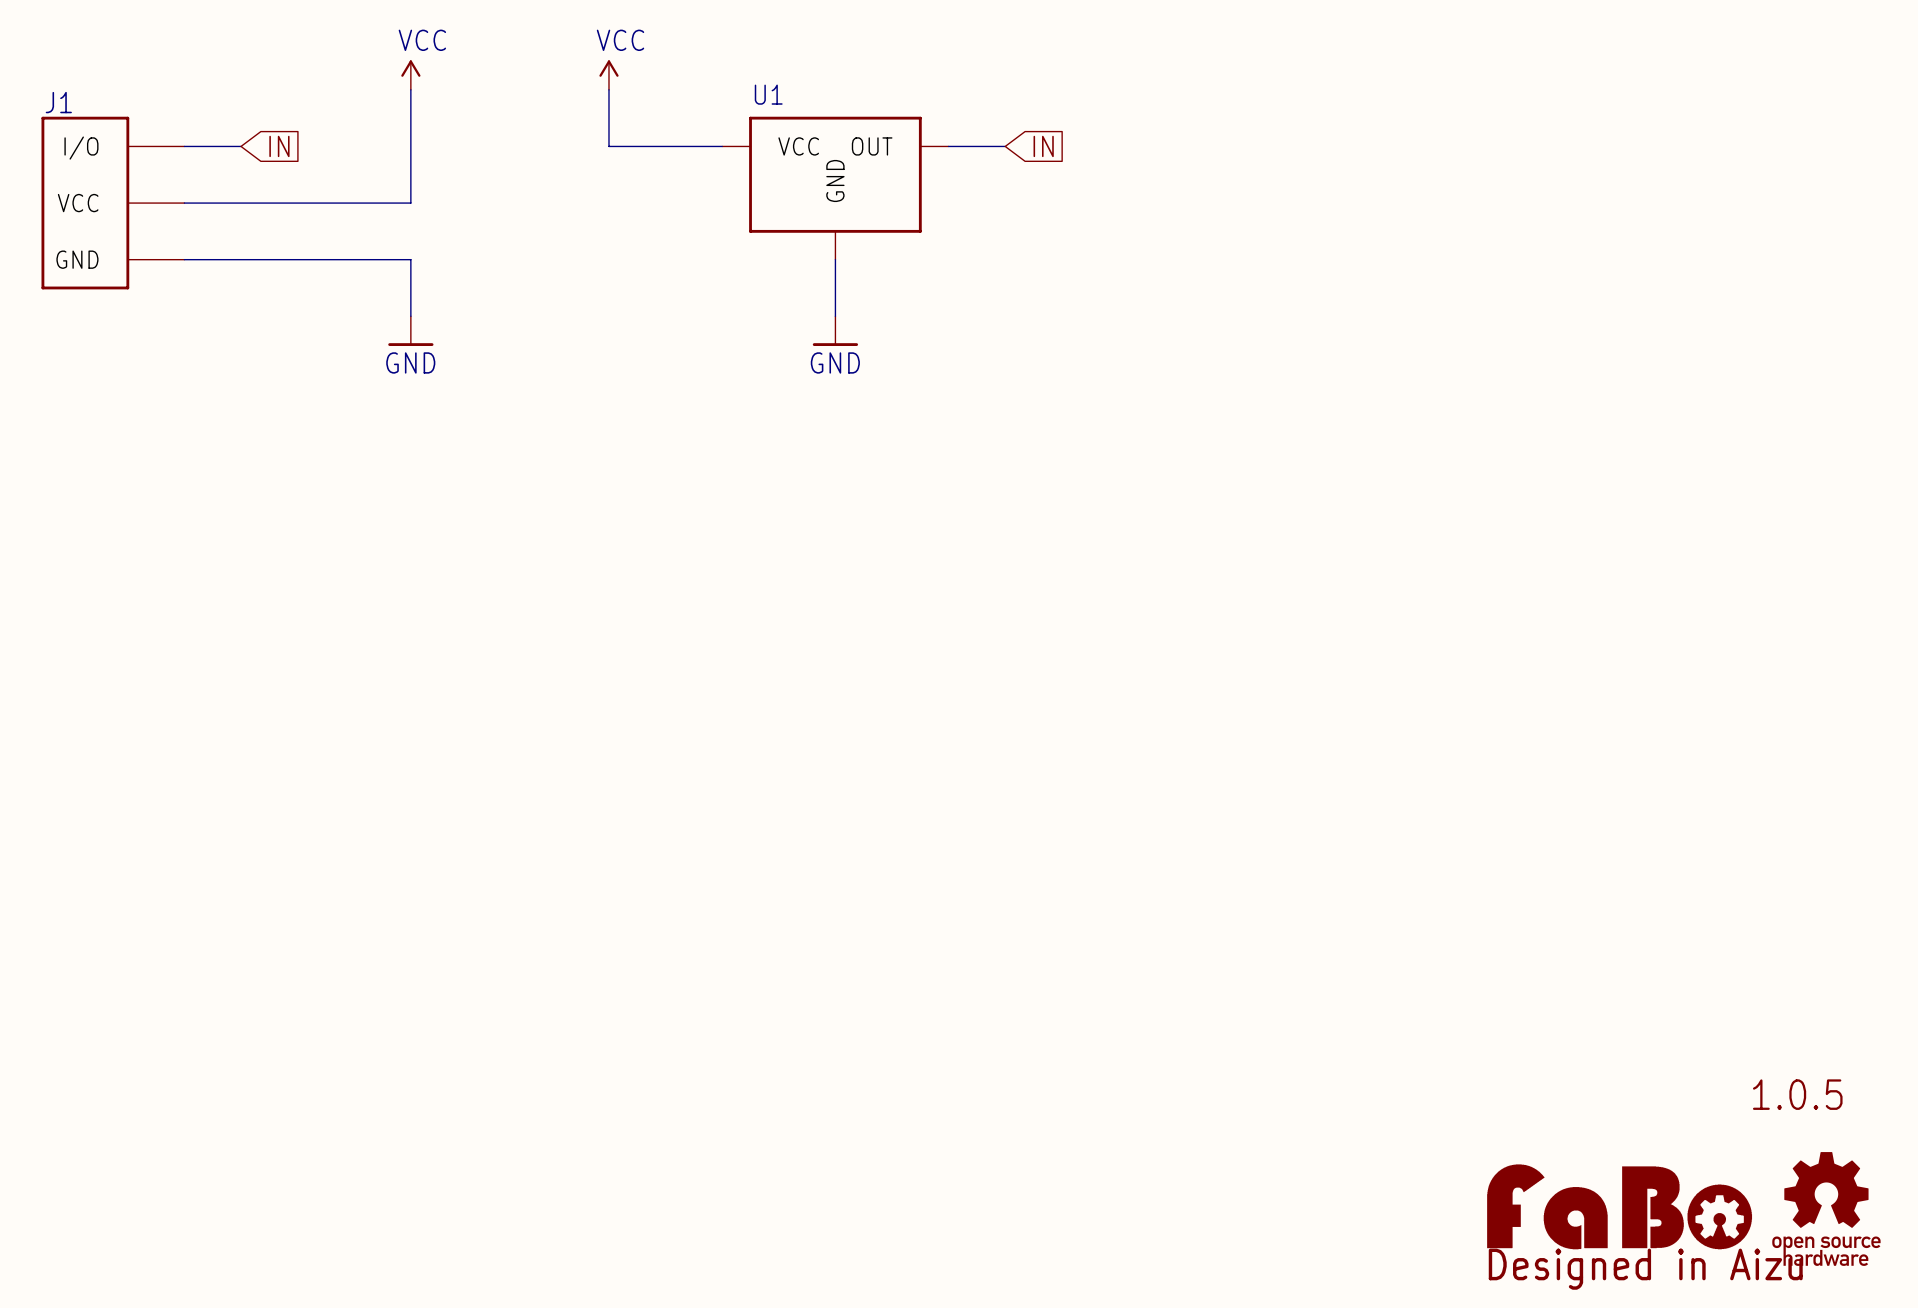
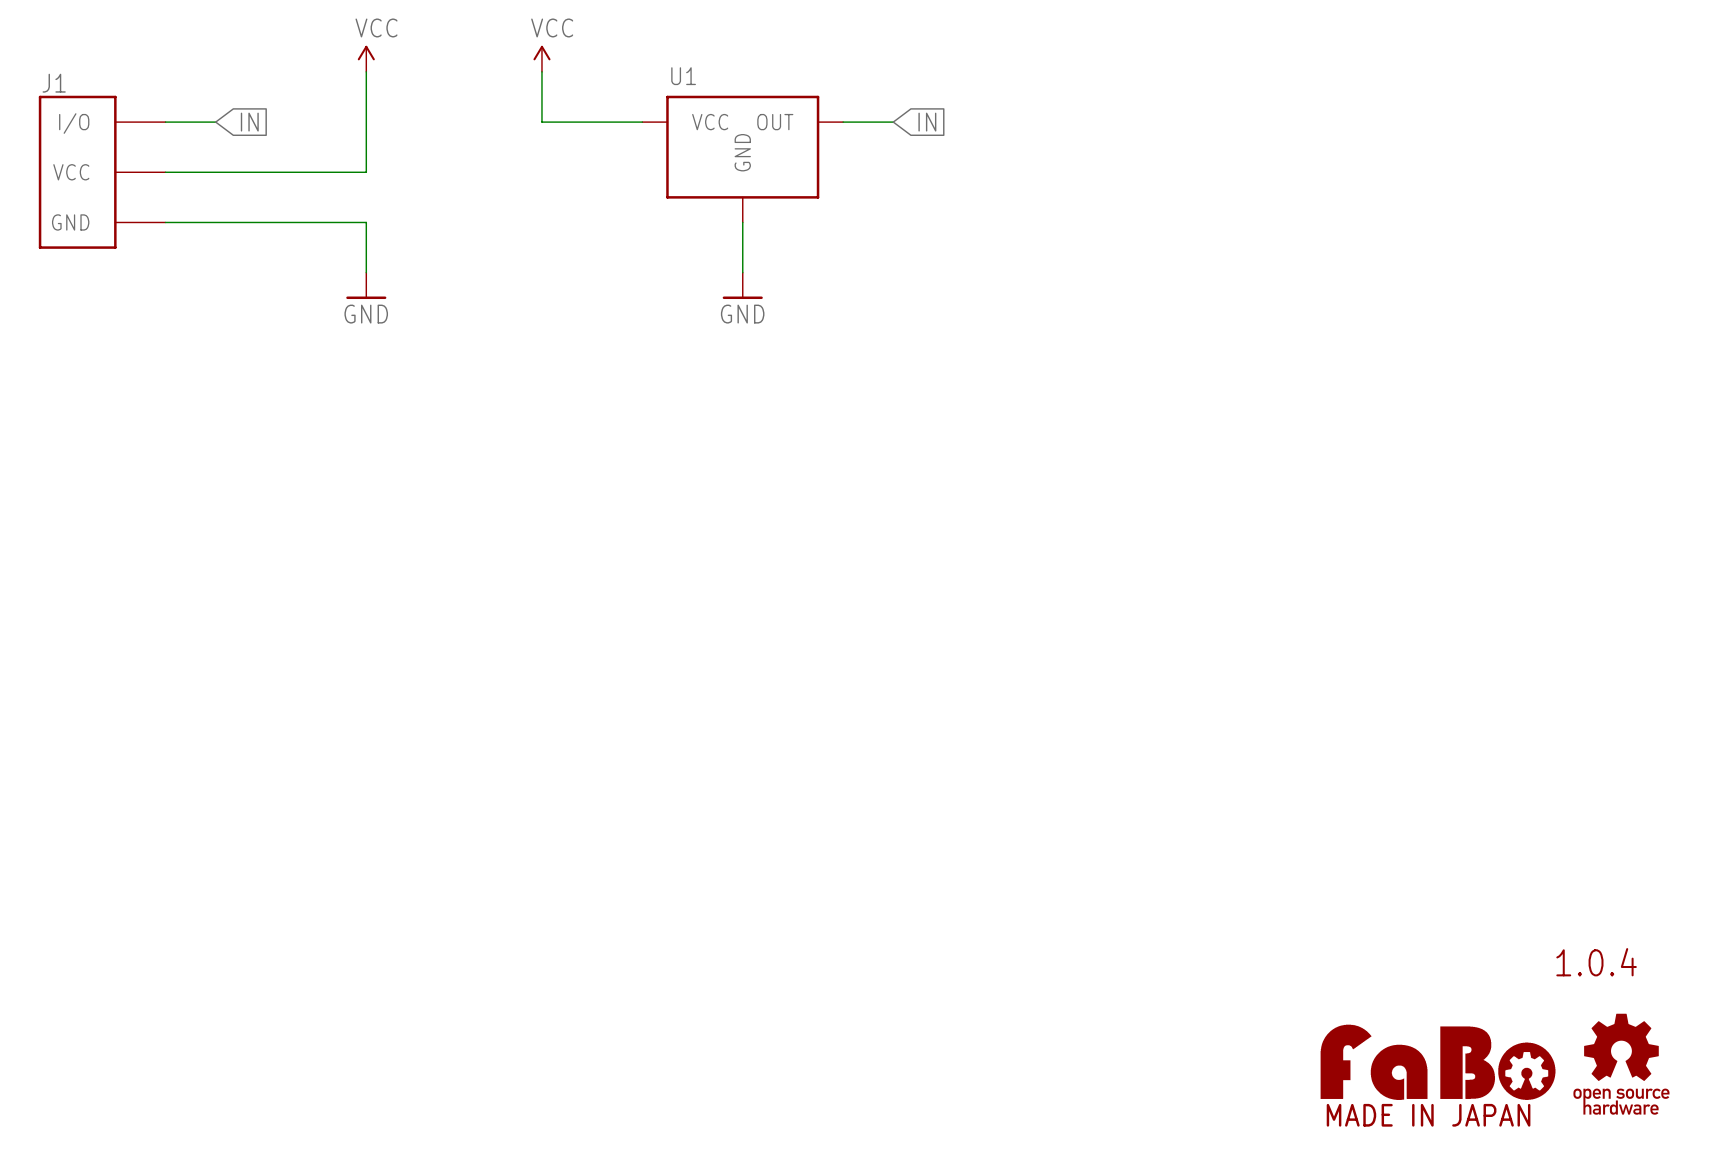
text: 1.0.5 (1797, 1094) -> 1.0.4 (1596, 962)
part text: none -> MADE IN JAPAN (1428, 1115)
part text: Designed in Aizu (1645, 1269) -> none

